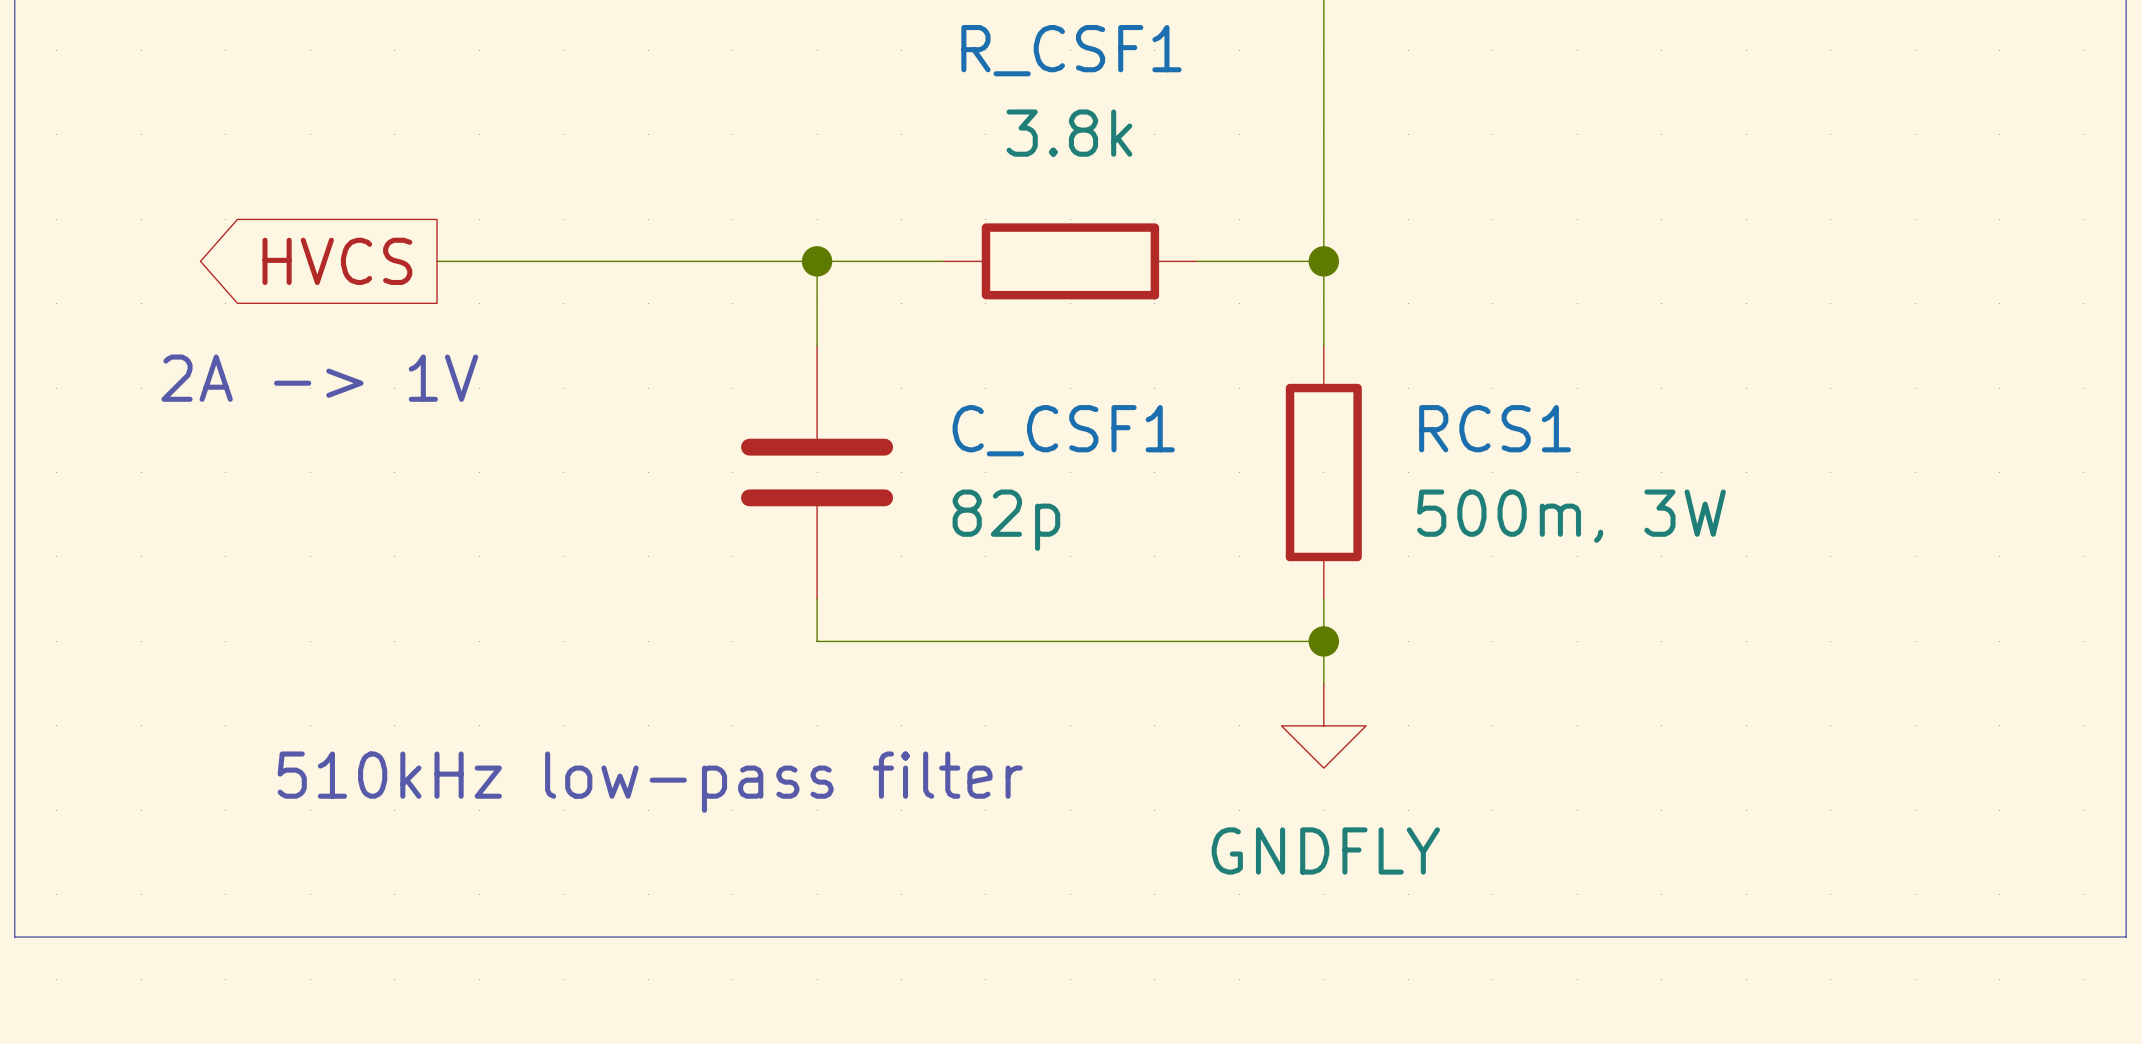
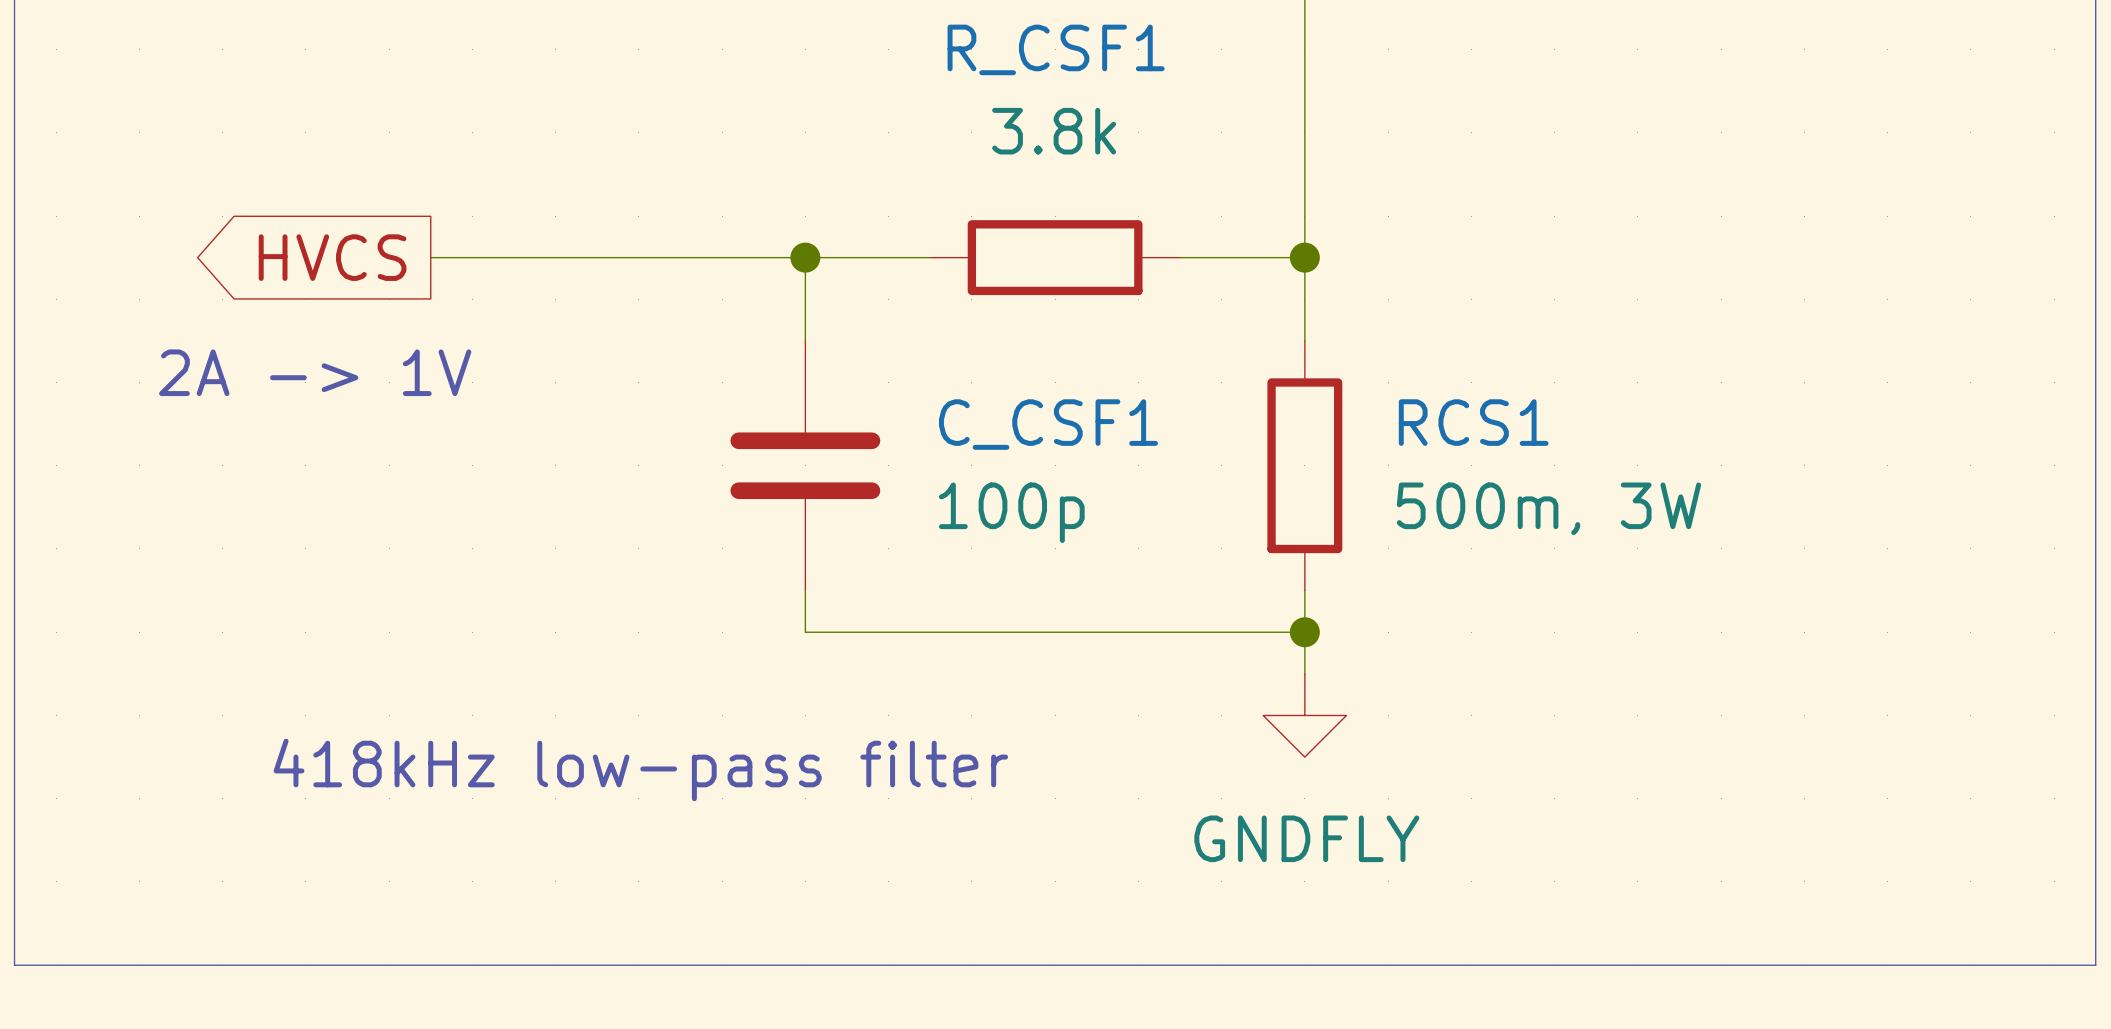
C_CSF1 value: 82p (1006, 520) -> 100p (1011, 512)
text: 510kHz low-pass filter (650, 782) -> 418kHz low-pass filter (640, 769)
line: (14, 937) (2126, 937) -> (14, 923) (14, 965) (2095, 965) (2095, 923)

